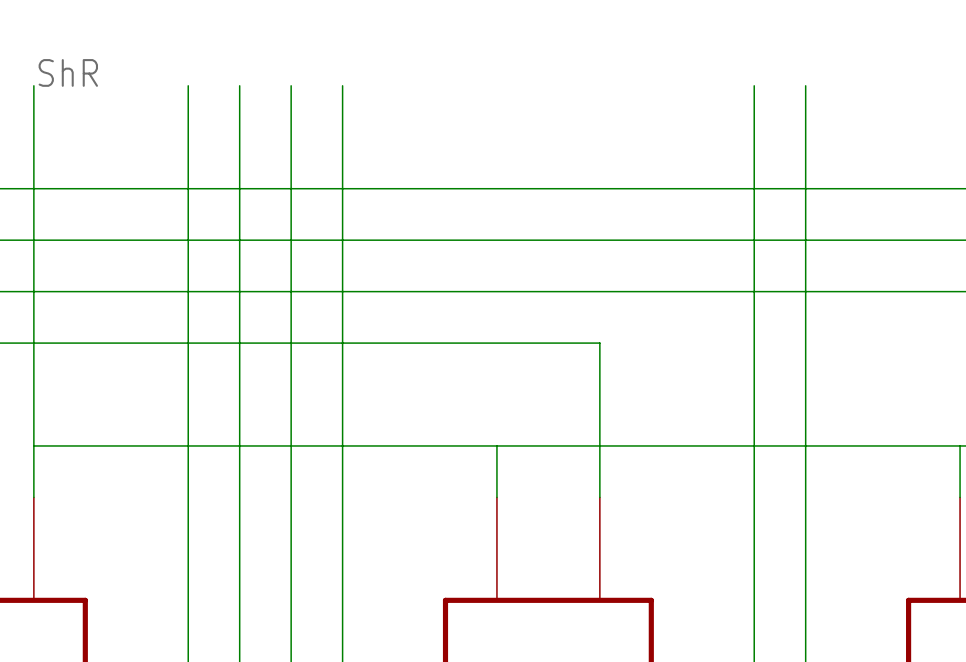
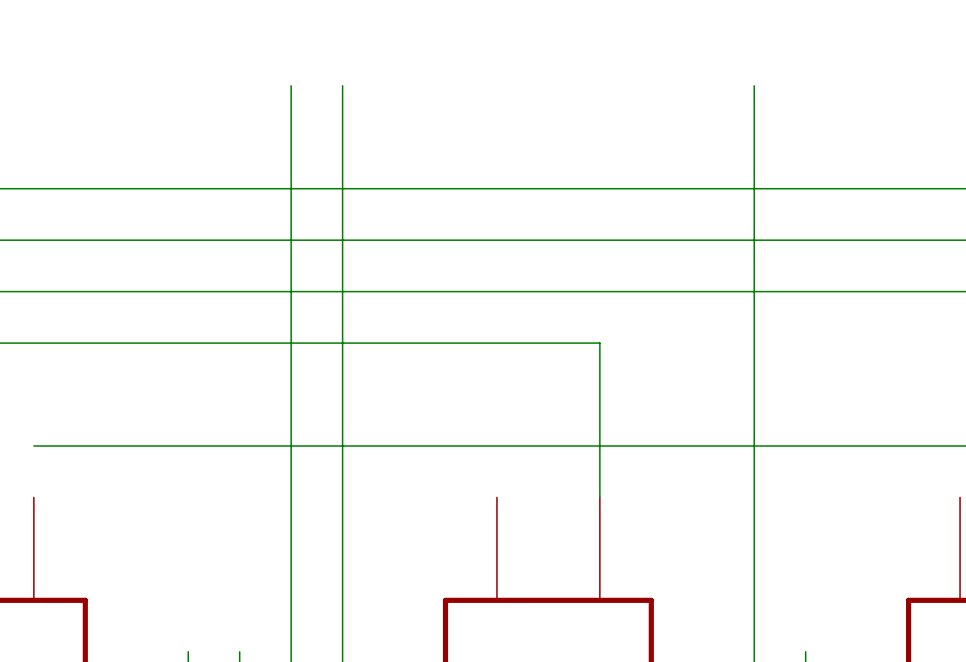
text: ShR (68, 72) -> none
wire: (33, 85) (33, 497) -> none
wire: (188, 85) (188, 651) -> none
wire: (239, 85) (239, 651) -> none
wire: (805, 85) (805, 651) -> none
wire: (496, 445) (496, 497) -> none
wire: (960, 445) (960, 497) -> none

